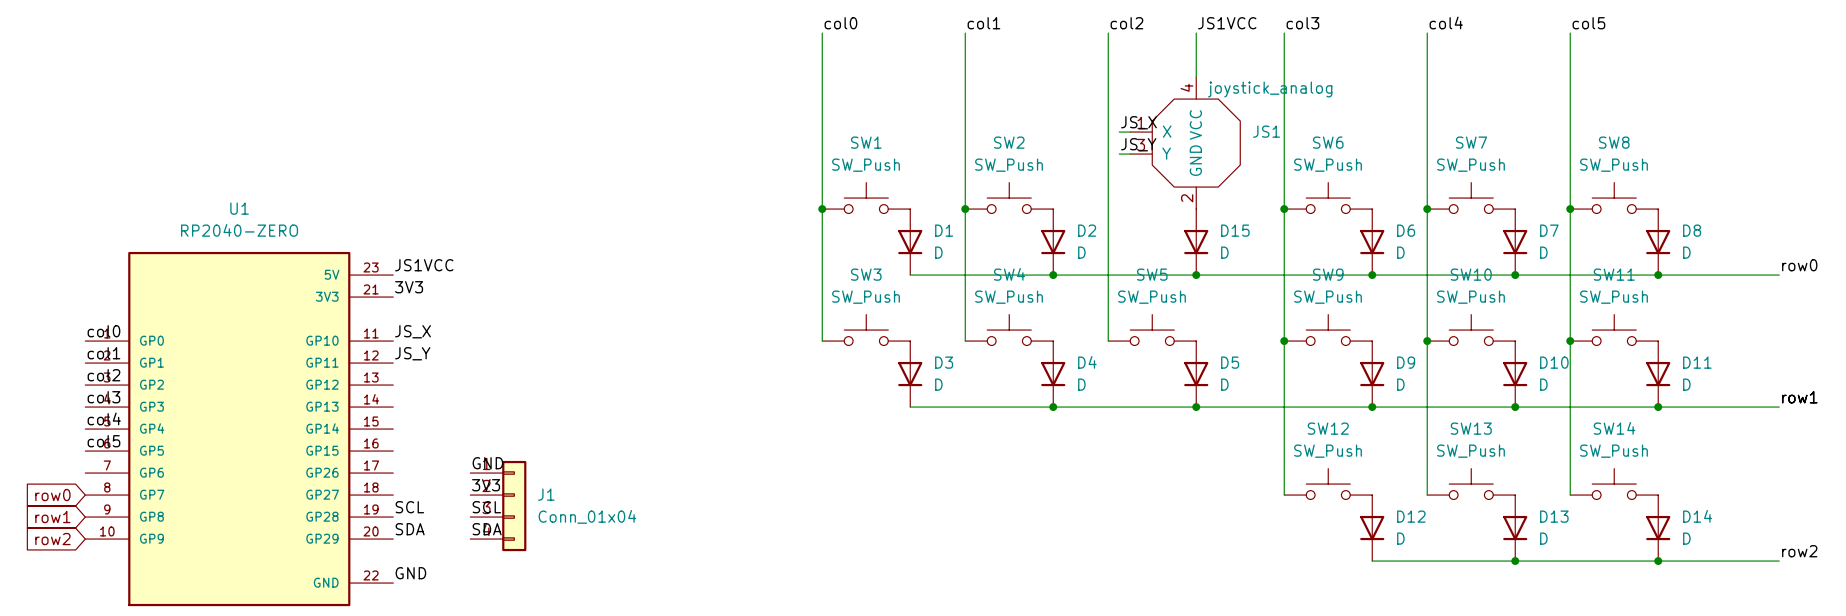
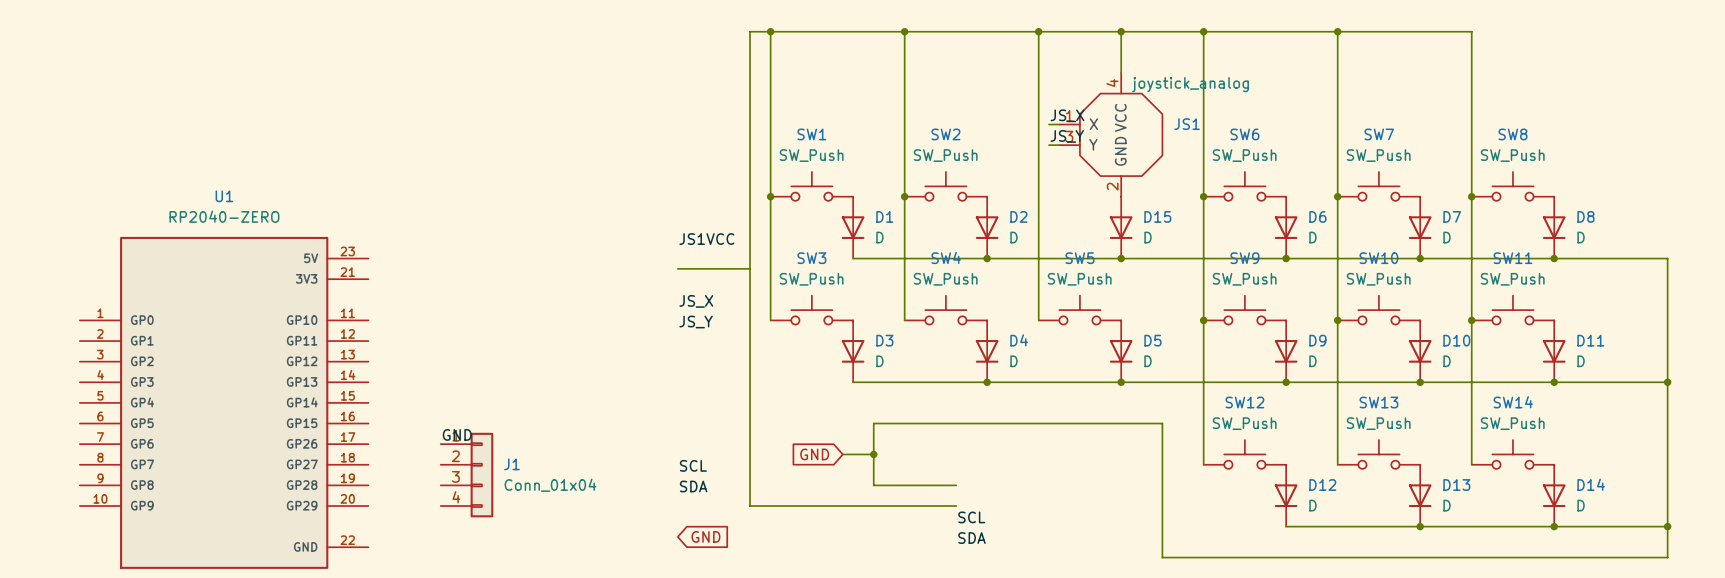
label: col4 (1446, 22) -> none
label: col0 (840, 23) -> none
label: col1 (983, 23) -> none
label: col2 (1126, 23) -> none
label: JS1VCC (1227, 23) -> none
label: col3 (1302, 23) -> none
label: col5 (1588, 23) -> none
junction: none -> (770, 31)
junction: none -> (904, 31)
junction: none -> (1038, 31)
junction: none -> (1121, 31)
junction: none -> (1203, 31)
junction: none -> (1337, 31)
wire: none -> (1471, 31) (750, 31) (750, 506) (956, 506)
label: none -> JS1VCC (706, 239)
label: JS1VCC (424, 265) -> none
label: row0 (1799, 265) -> none
wire: none -> (1667, 258) (1667, 557) (1162, 557) (1162, 423) (873, 423) (873, 485) (956, 485)
wire: none -> (677, 268) (750, 268)
label: 3V3 (409, 287) -> none
label: none -> JS_X (696, 301)
label: col0 (103, 331) -> none
label: JS_X (413, 331) -> none
label: none -> JS_Y (696, 322)
label: col1 (103, 353) -> none
label: JS_Y (412, 353) -> none
label: col2 (103, 375) -> none
label: col3 (103, 397) -> none
label: row1 (1799, 397) -> none
junction: none -> (1667, 382)
label: col4 (104, 418) -> none
label: col5 (103, 441) -> none
global label: none -> GND (814, 454)
wire: none -> (842, 454) (873, 454)
junction: none -> (873, 454)
label: 3V3 (486, 485) -> none
global label: row0 (52, 495) -> none
label: none -> SCL (693, 465)
label: SCL (409, 507) -> none
label: SCL (486, 507) -> none
global label: row1 (52, 517) -> none
label: none -> SDA (693, 486)
label: SDA (410, 529) -> none
label: SDA (487, 529) -> none
global label: row2 (52, 539) -> none
label: none -> SCL (971, 517)
label: row2 (1799, 551) -> none
junction: none -> (1667, 526)
global label: none -> GND (705, 536)
label: GND (410, 573) -> none
label: none -> SDA (972, 538)

